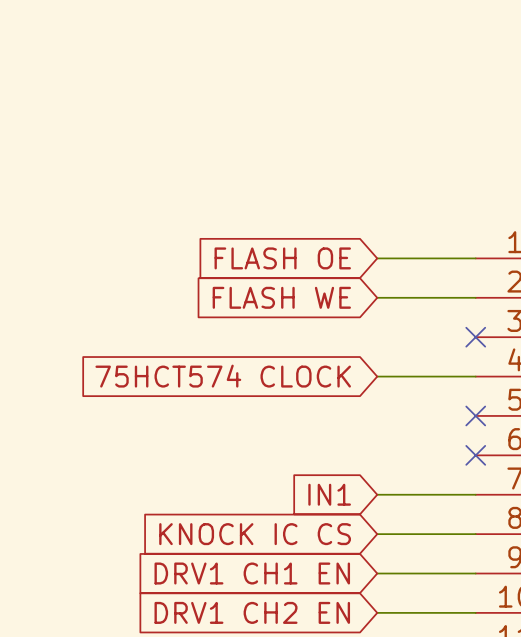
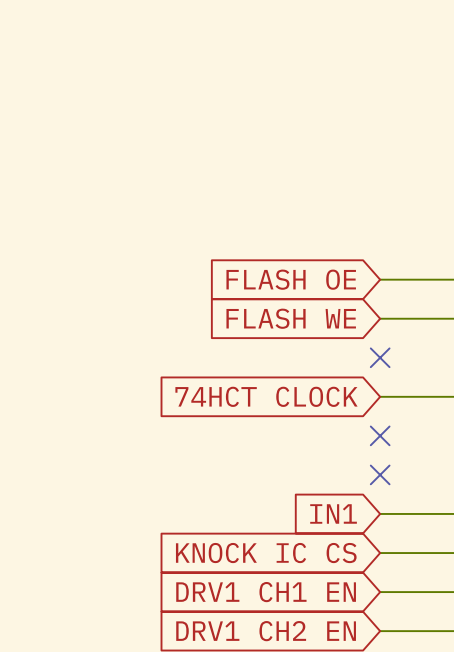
no-connect mark: none -> (380, 357)
global label: 75HCT574 CLOCK (223, 376) -> 74HCT CLOCK (266, 396)
no-connect mark: none -> (380, 435)
no-connect mark: none -> (380, 474)

